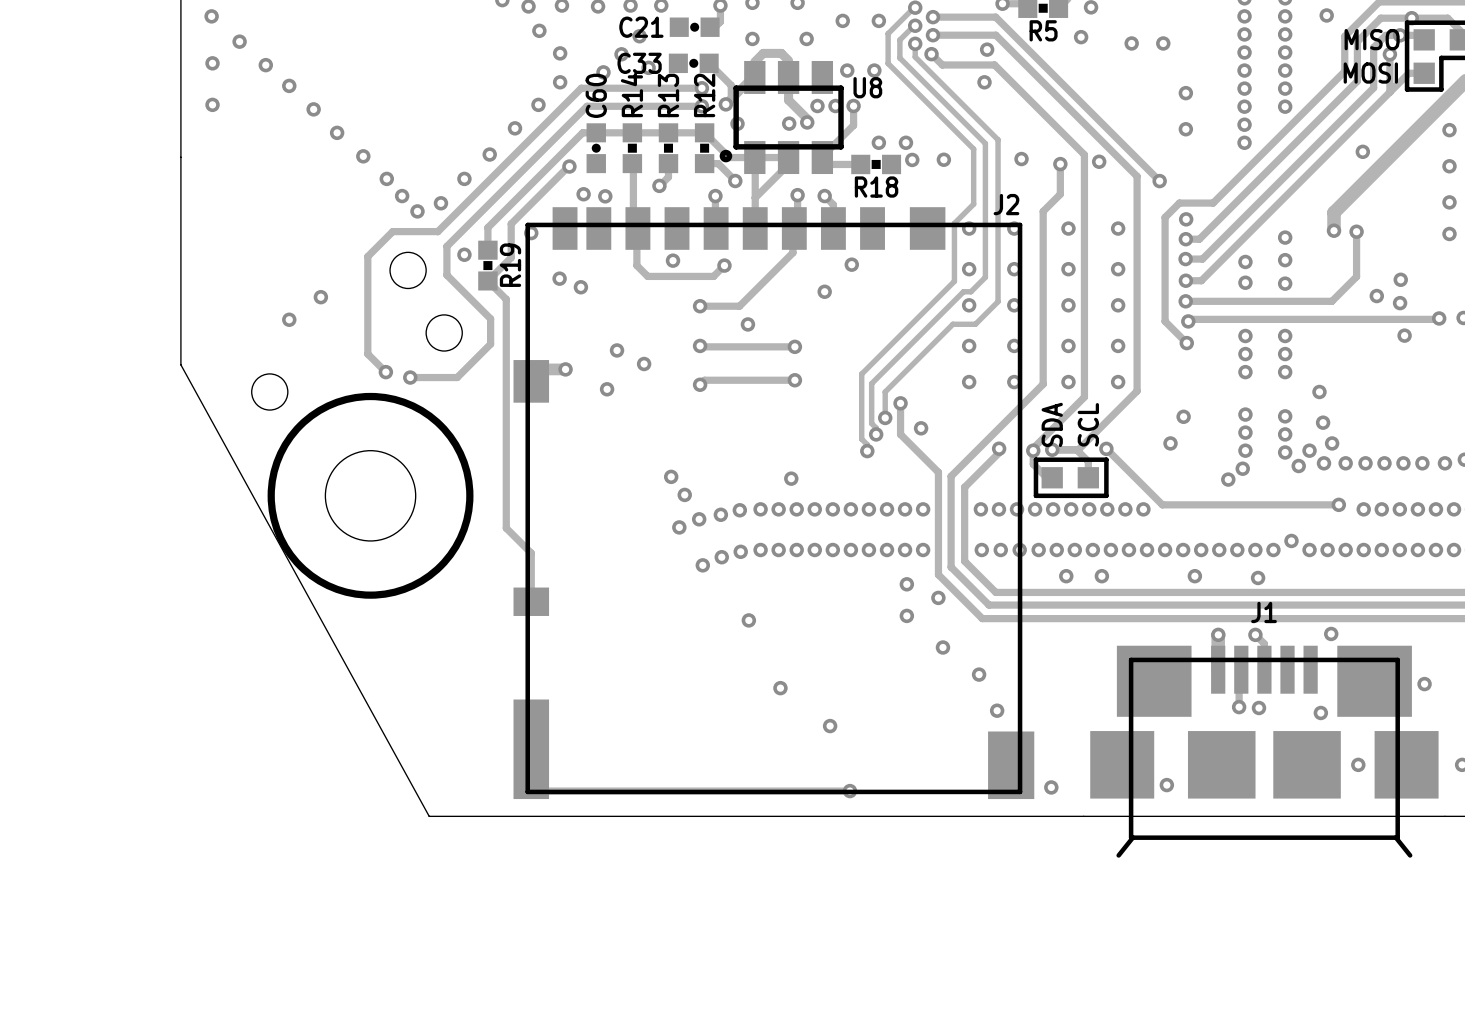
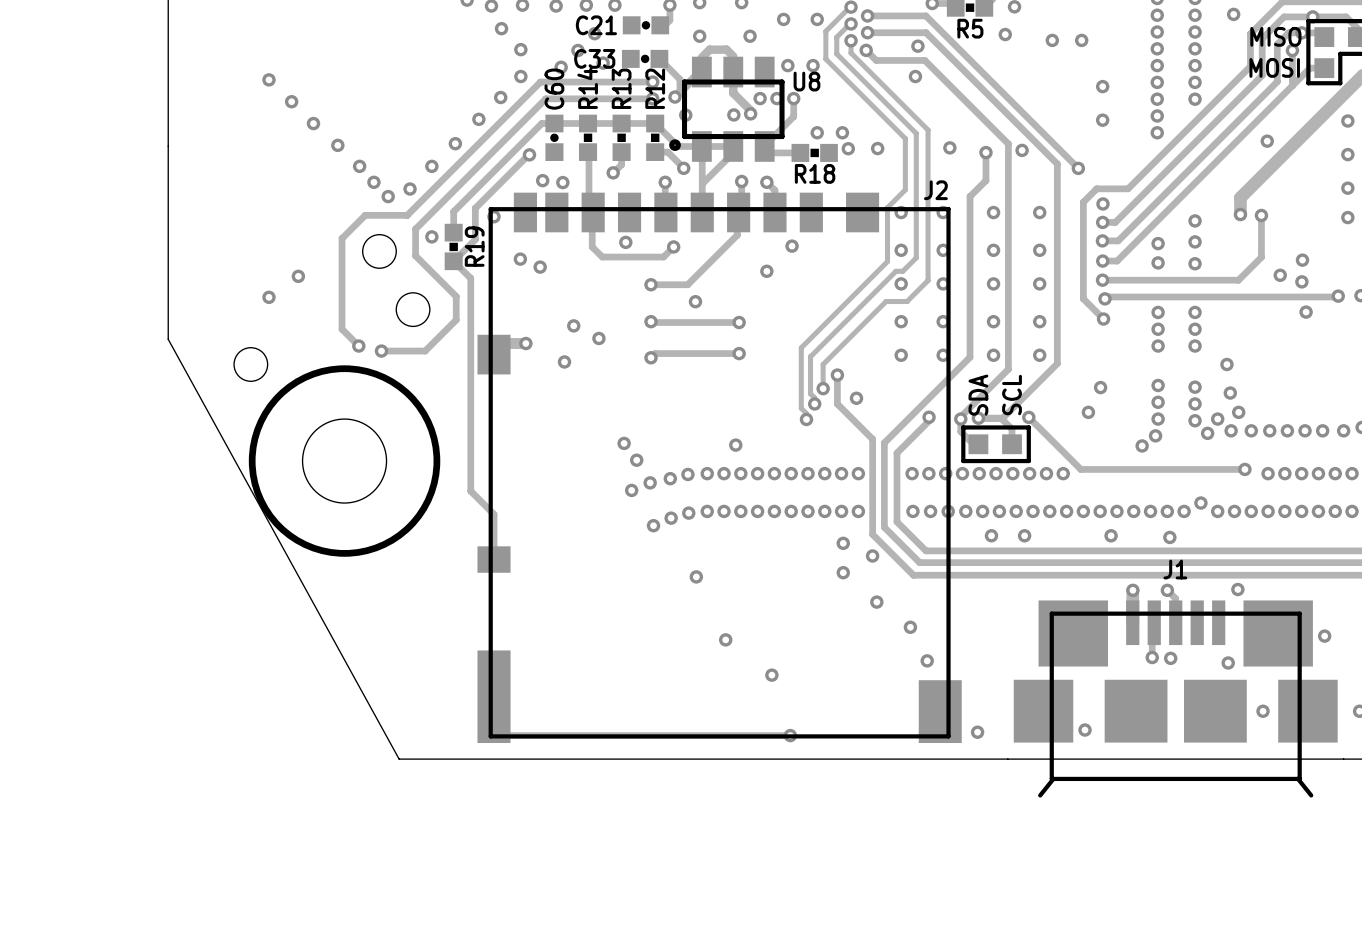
via: (211, 16) -> none
via: (239, 41) -> none
via: (212, 63) -> none
via: (265, 65) -> none
via: (212, 104) -> none

